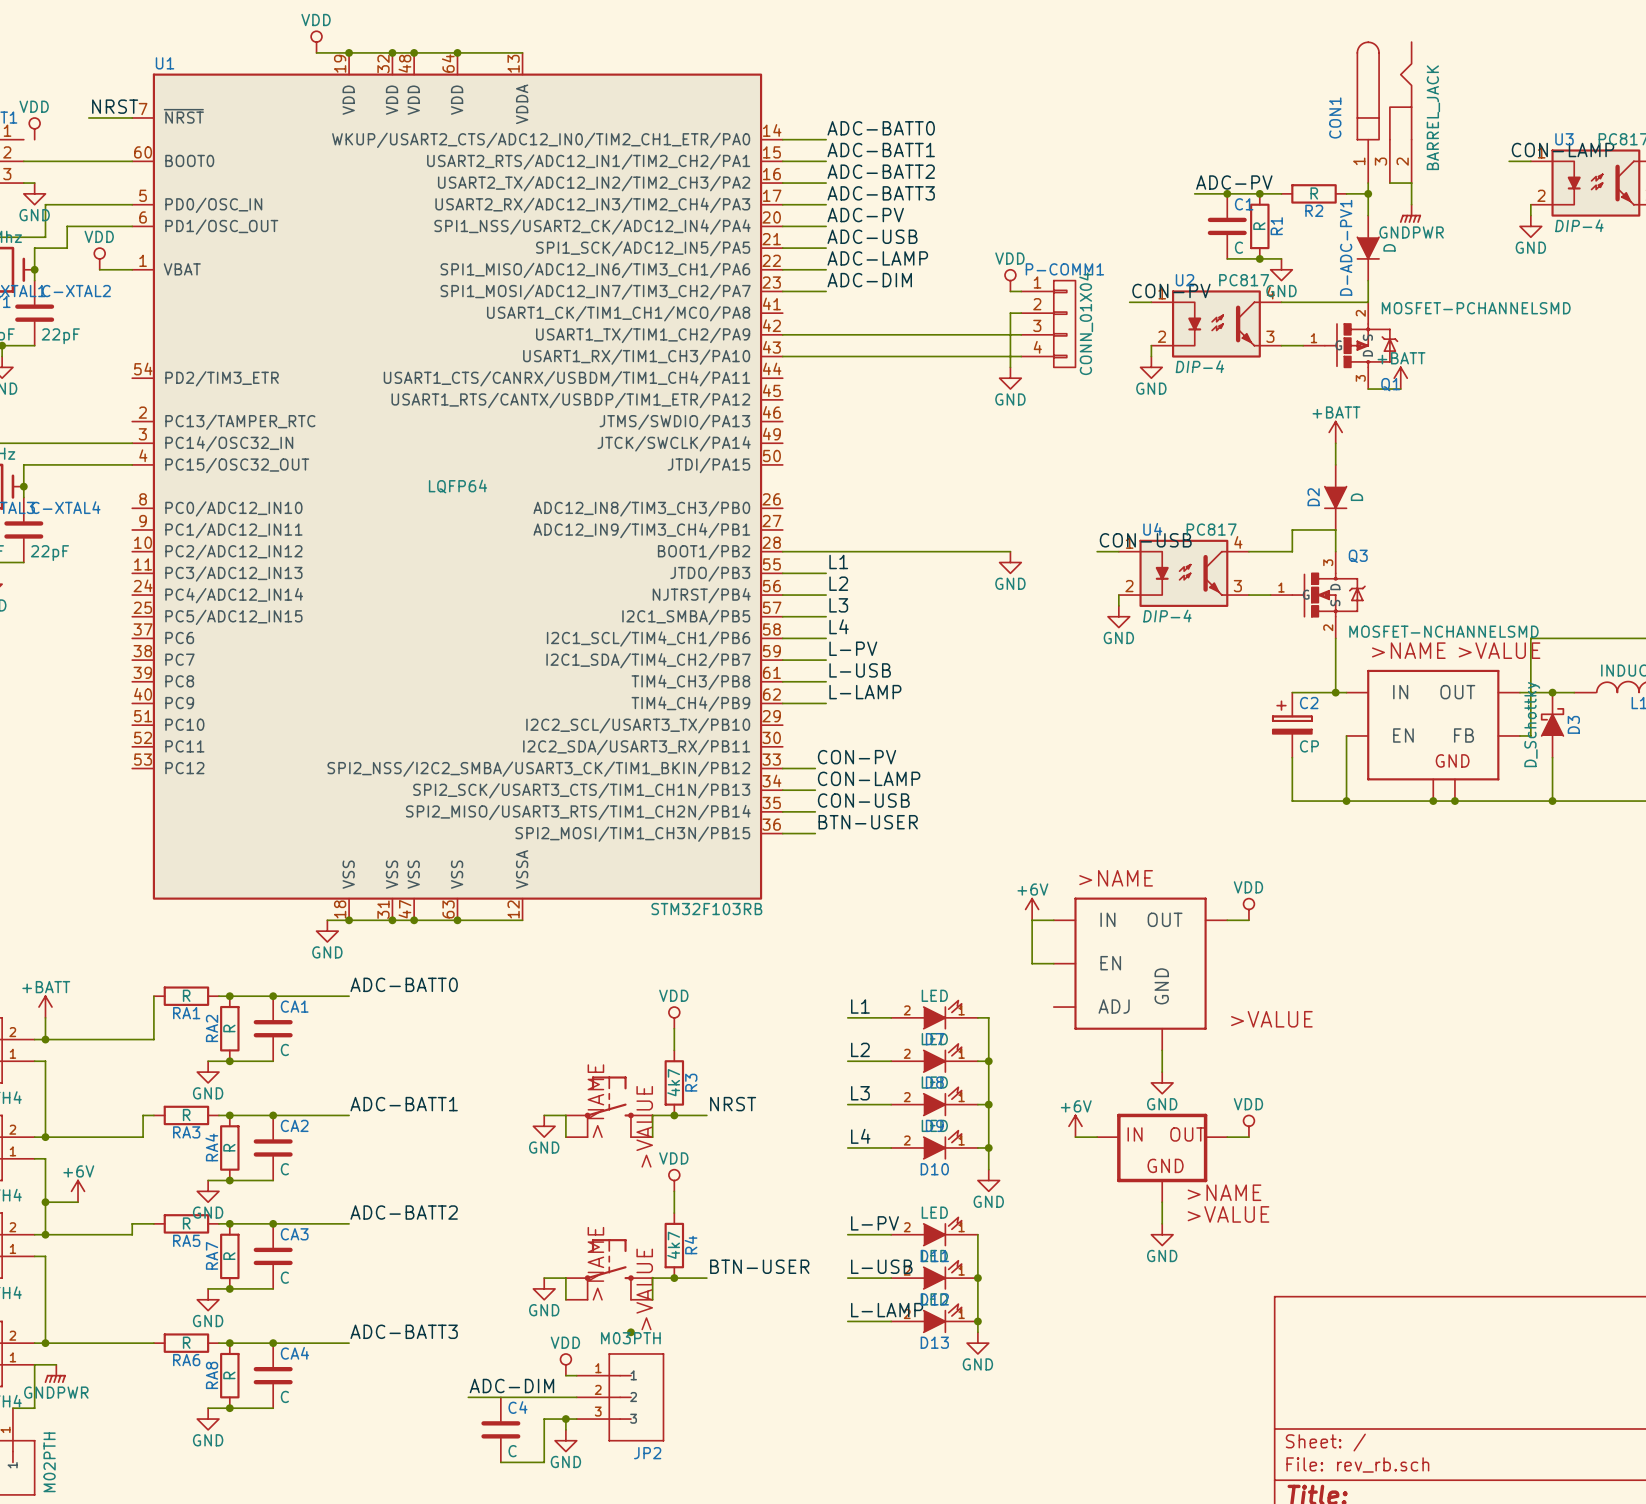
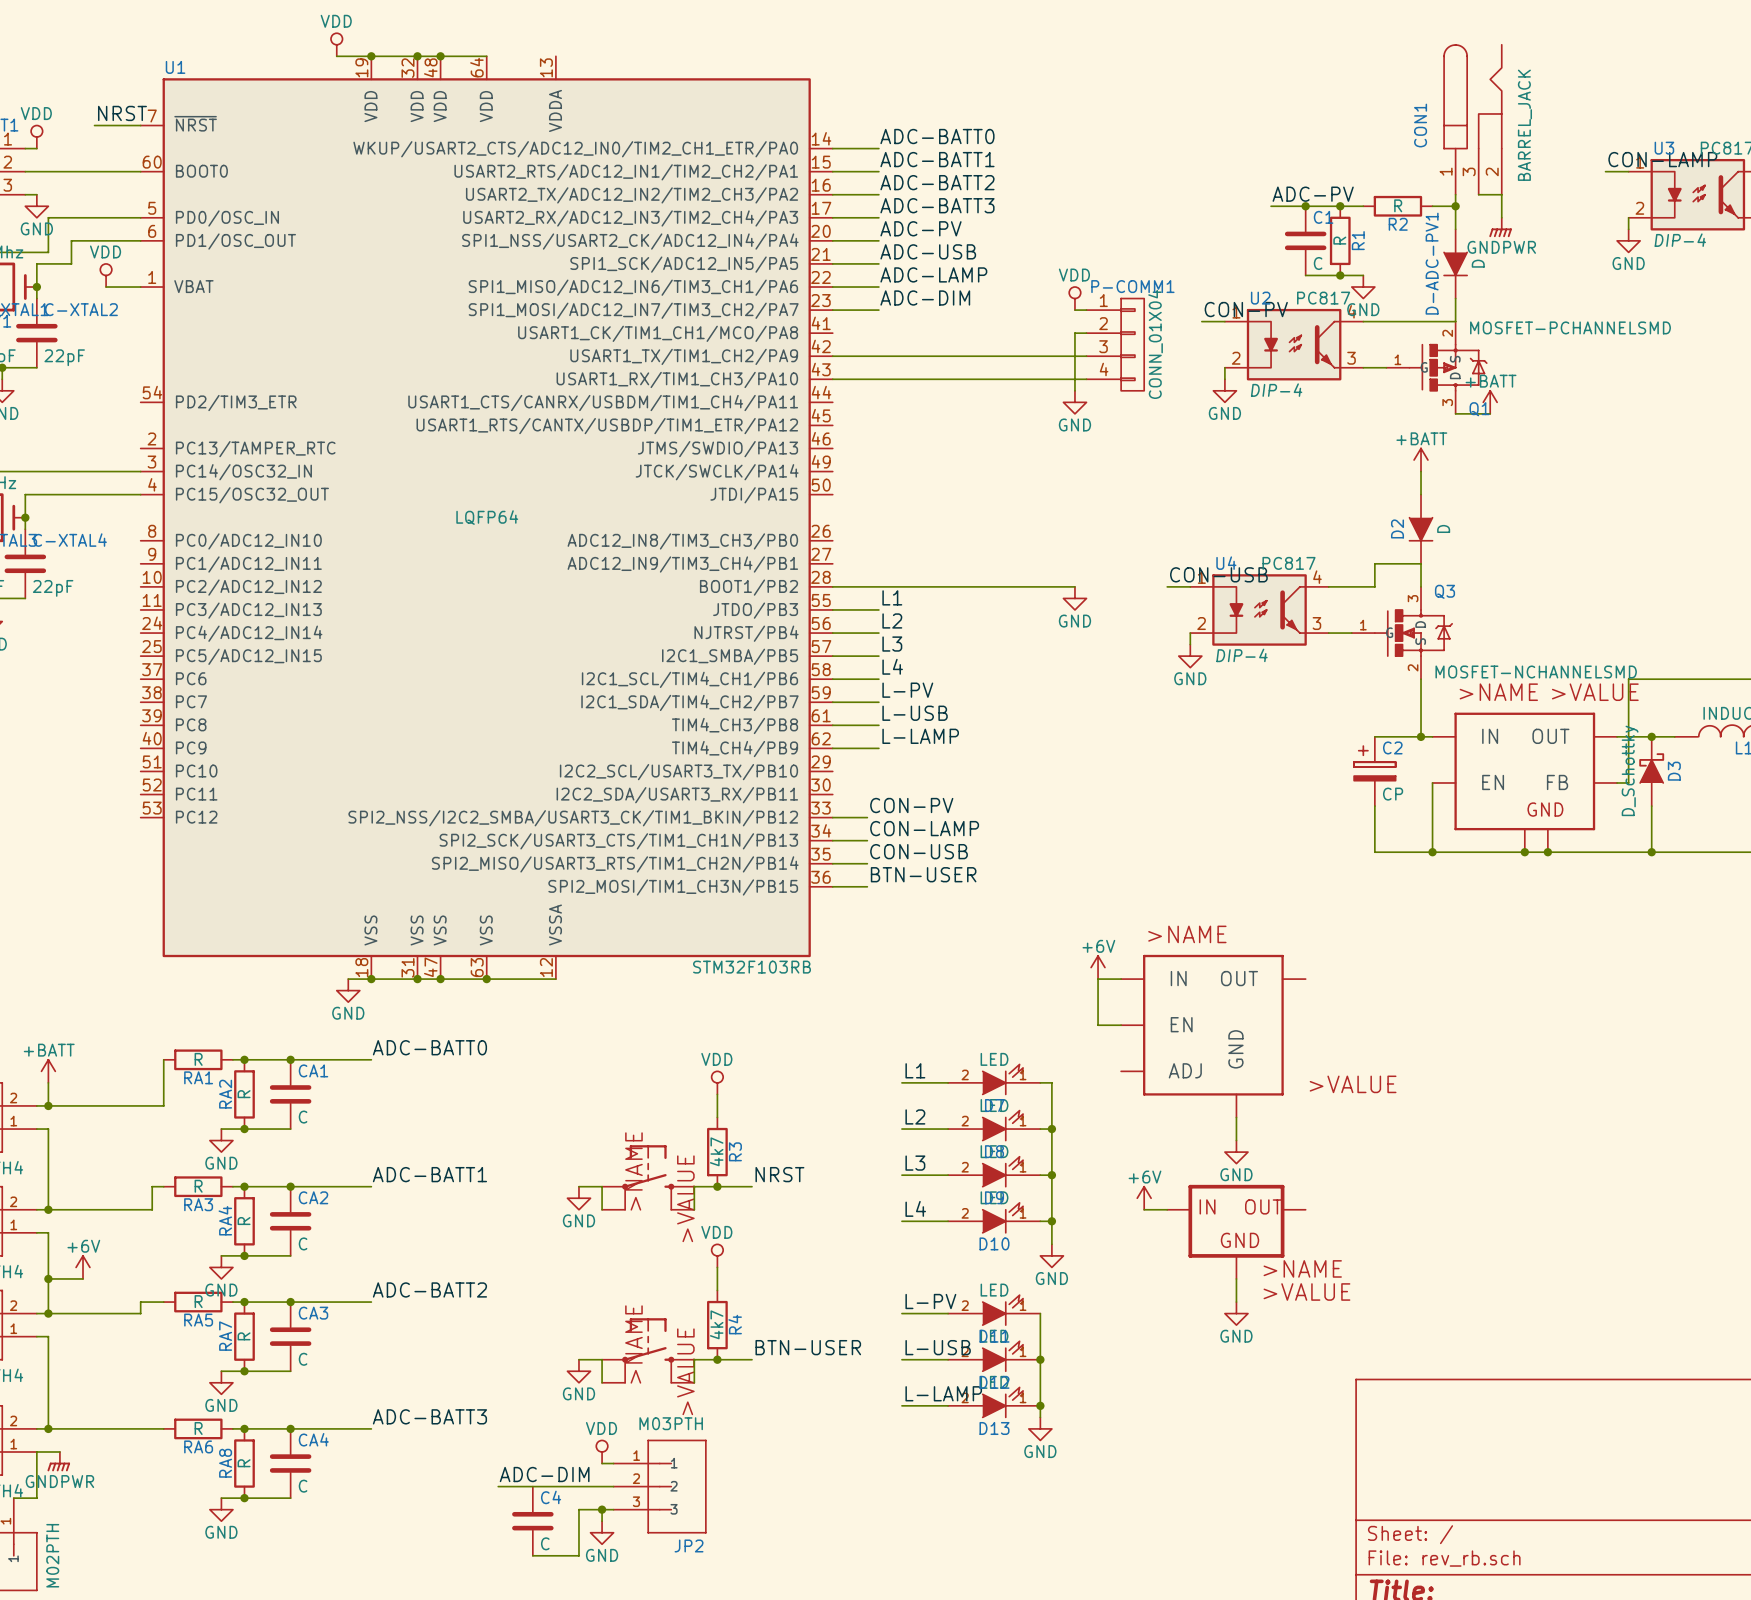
wire: (457, 52) (522, 52) -> none
junction: (457, 52) -> none
wire: none -> (25, 148) (36, 148)
power symbol: VDD (1248, 909) -> none
wire: (1227, 920) (1248, 920) -> none
power symbol: VDD (1248, 1126) -> none
wire: (1227, 1137) (1248, 1137) -> none
junction: (630, 1332) -> none

